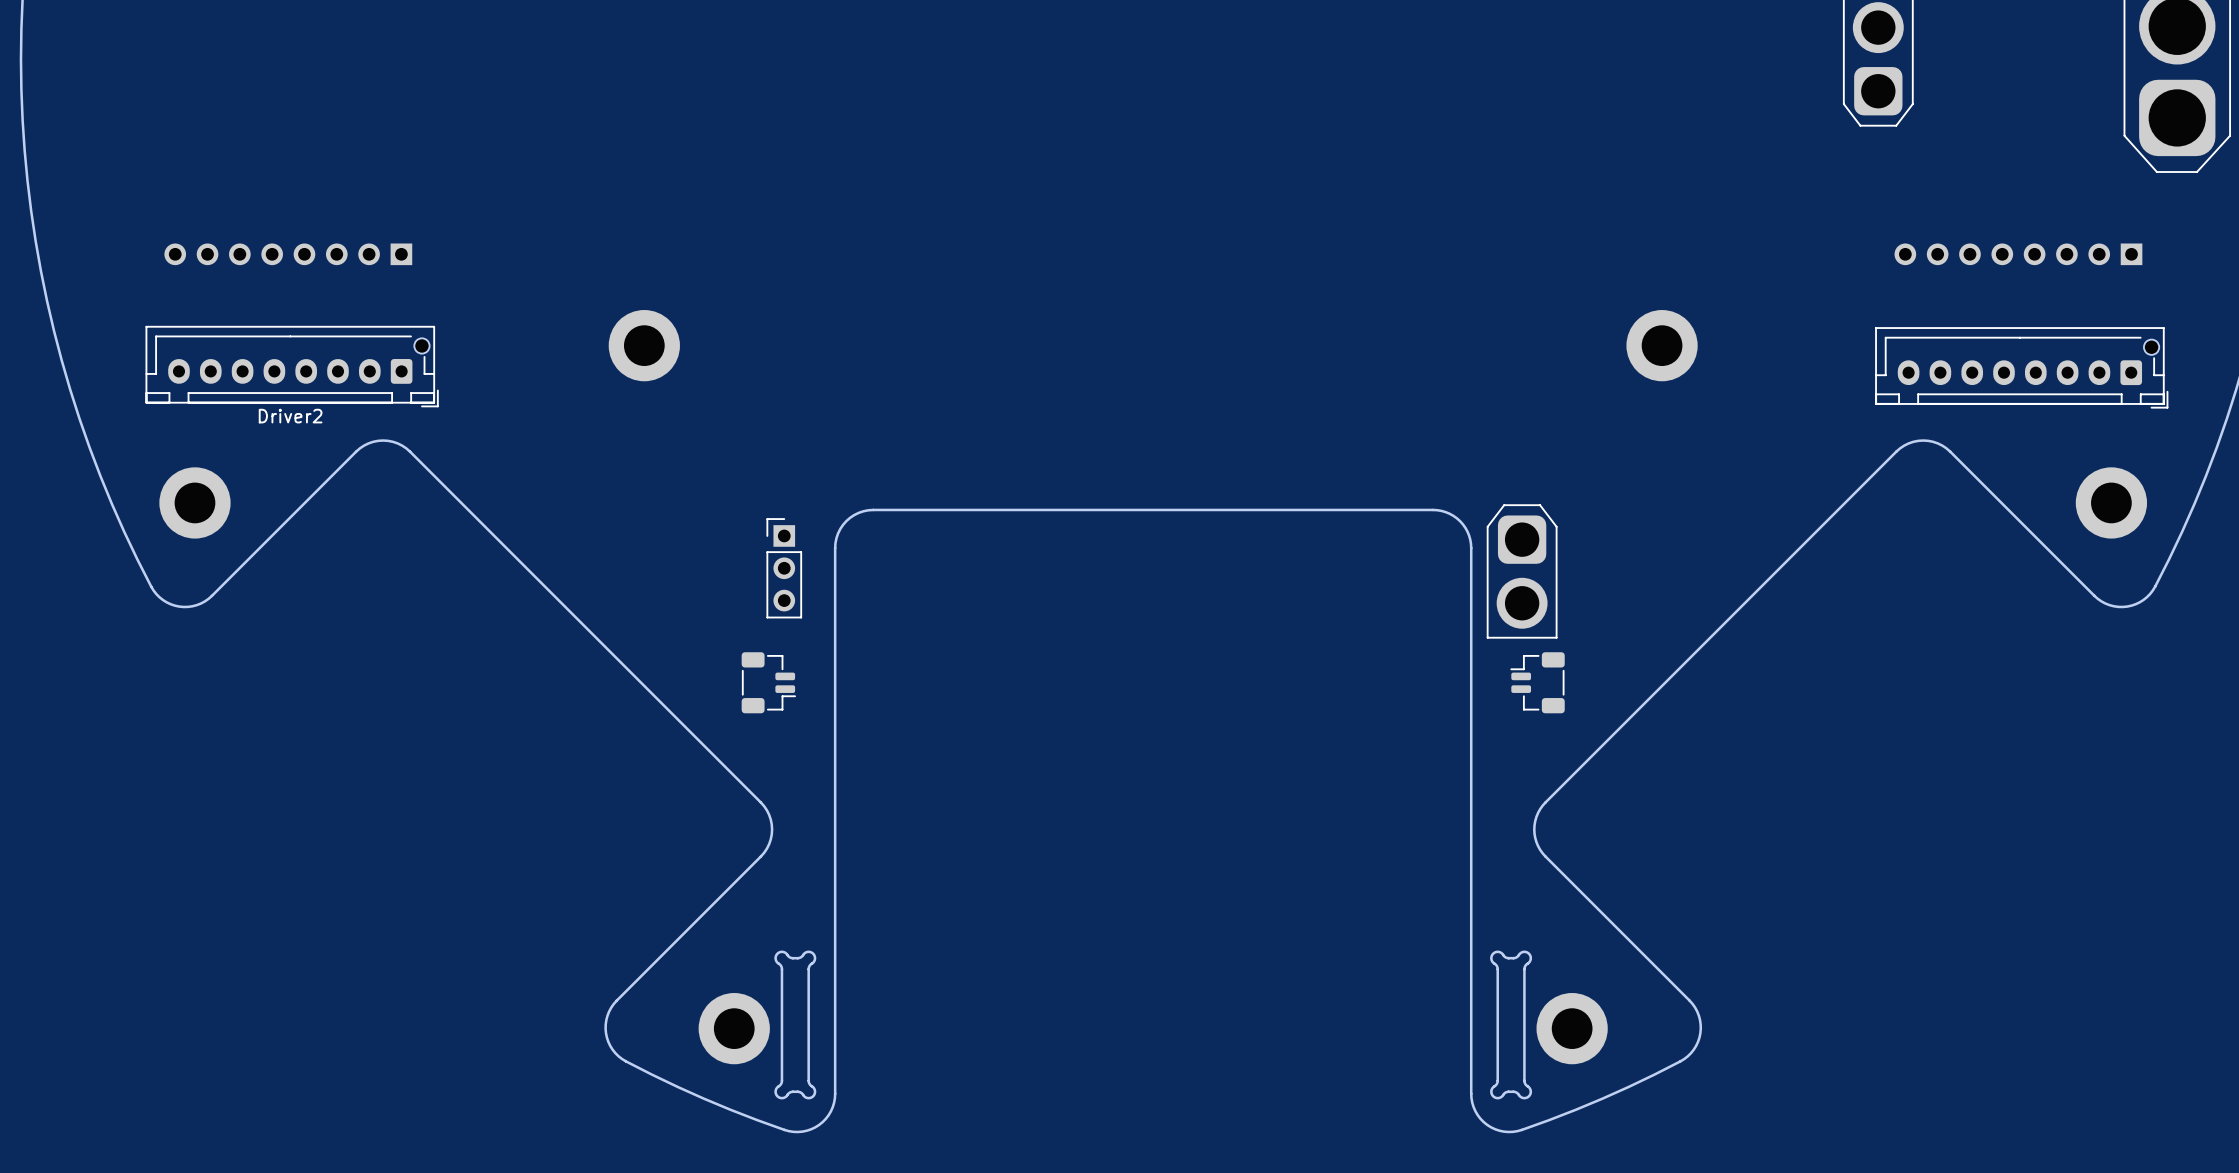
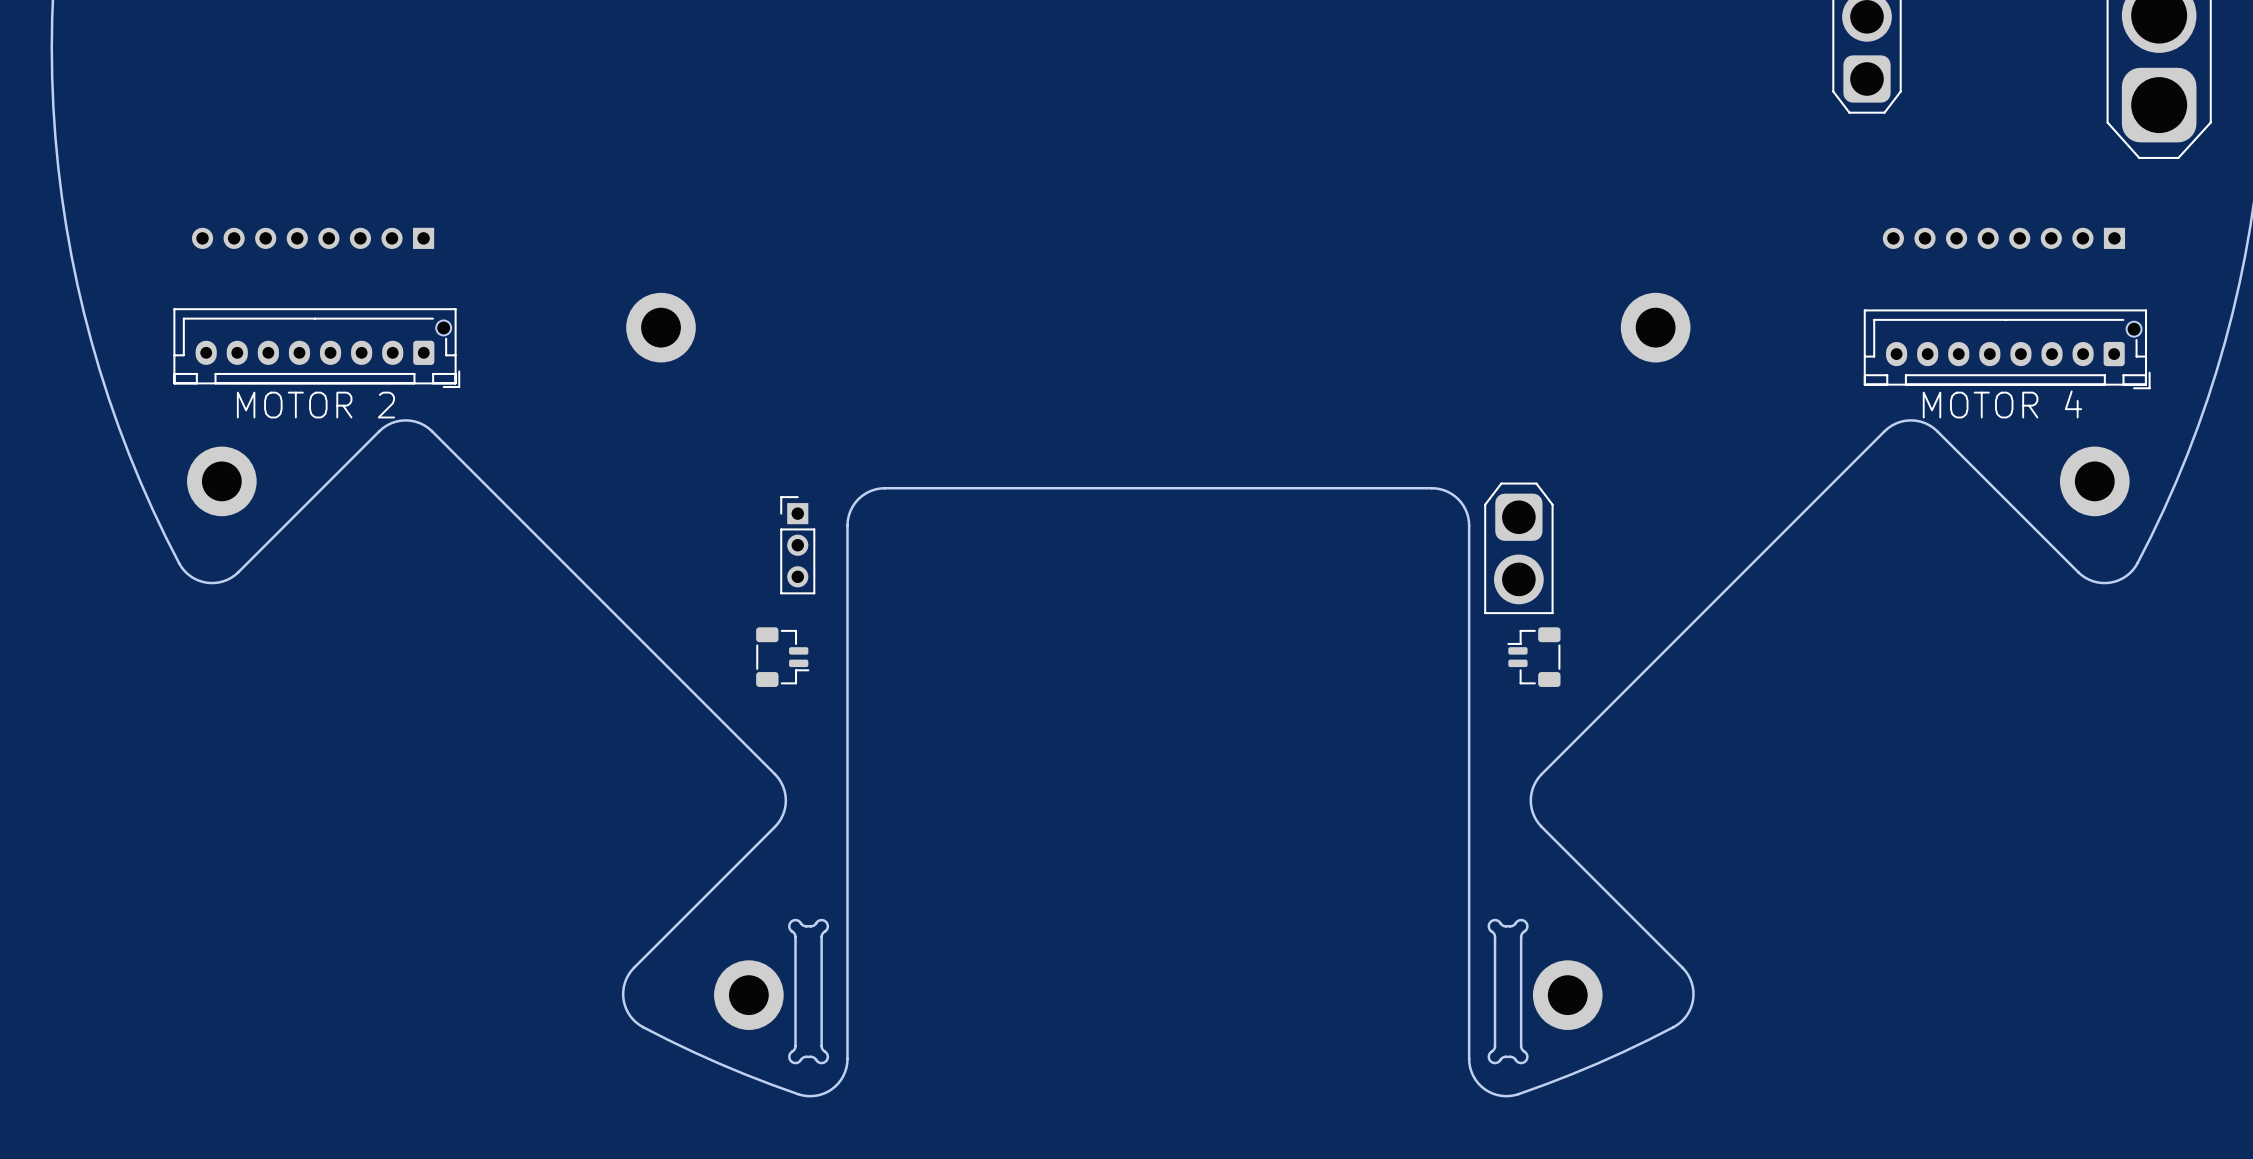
Driver2 name: Driver2 (290, 416) -> none
text: none -> MOTOR 2 (315, 405)
text: none -> MOTOR 4 (2002, 404)

